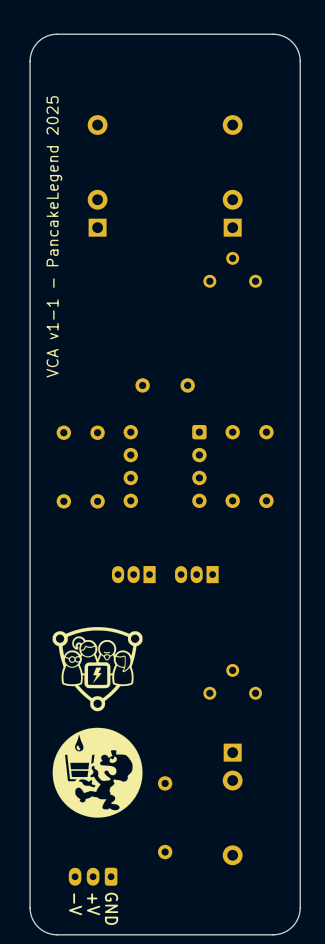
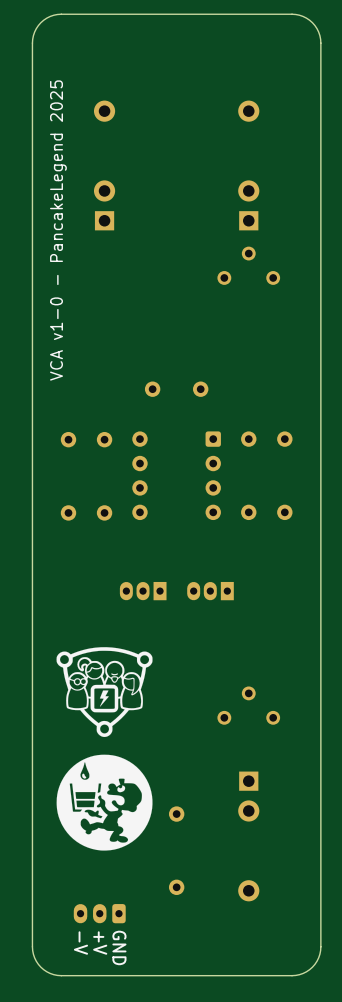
text: VCA v1-1 - PancakeLegend 2025 (54, 236) -> VCA v1-0 - PancakeLegend 2025 (58, 230)

